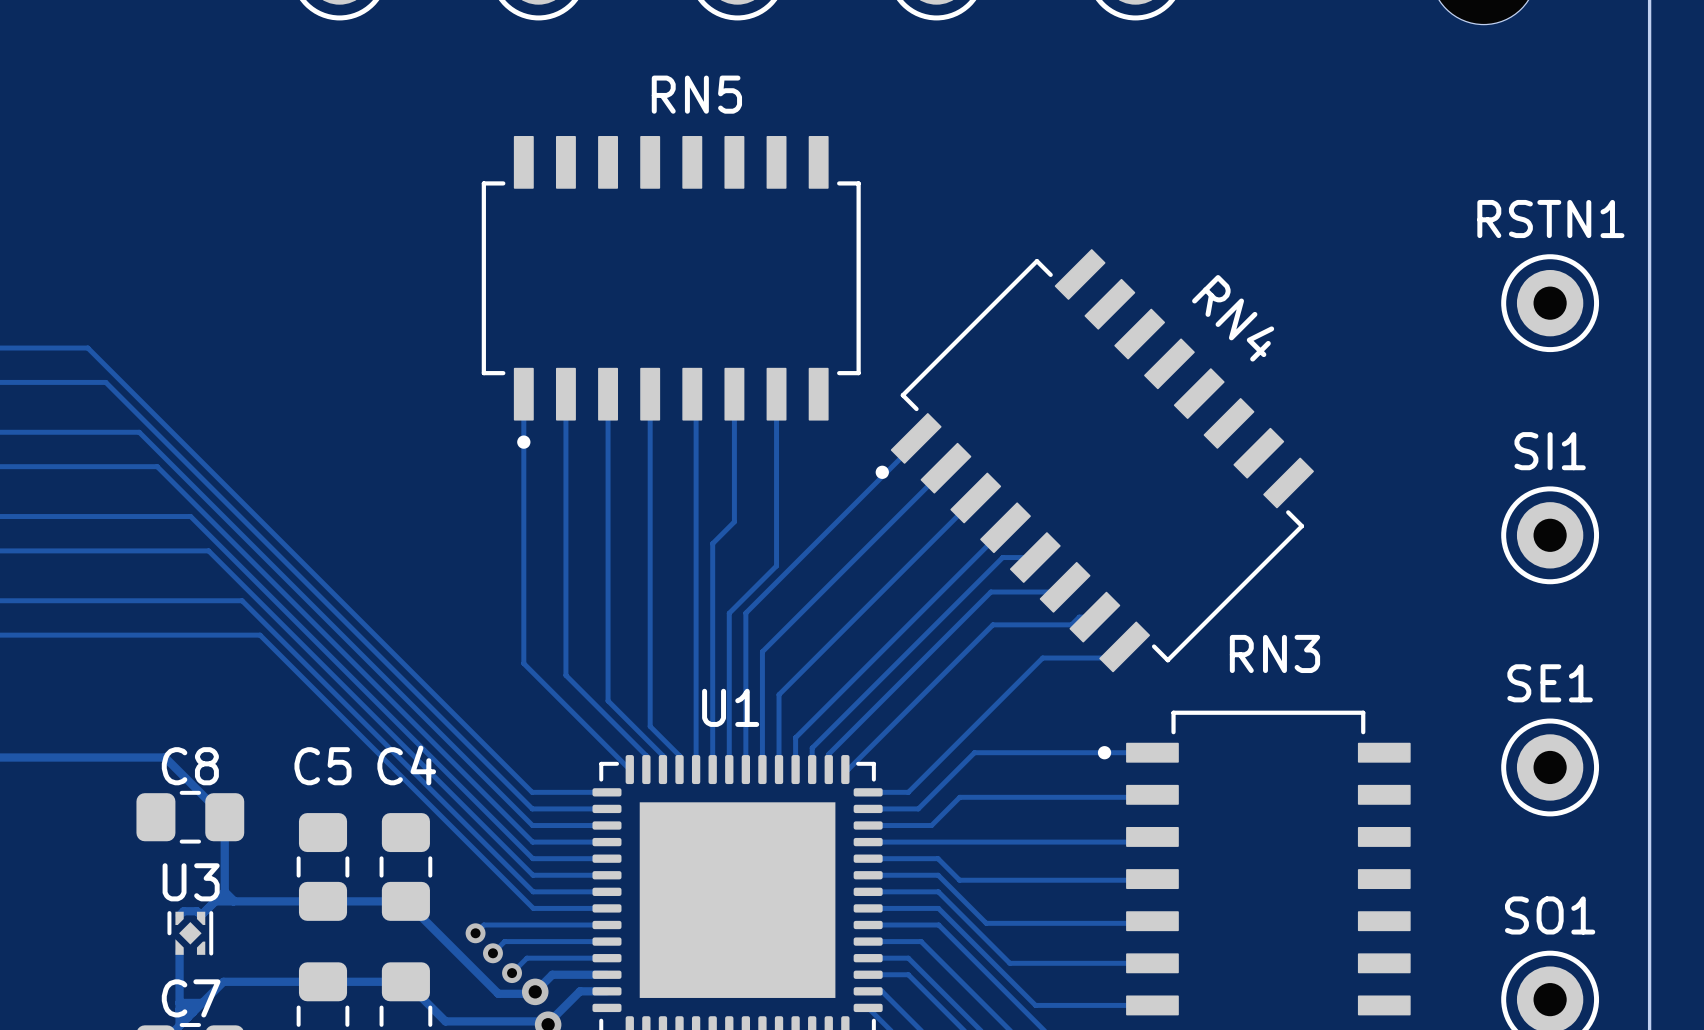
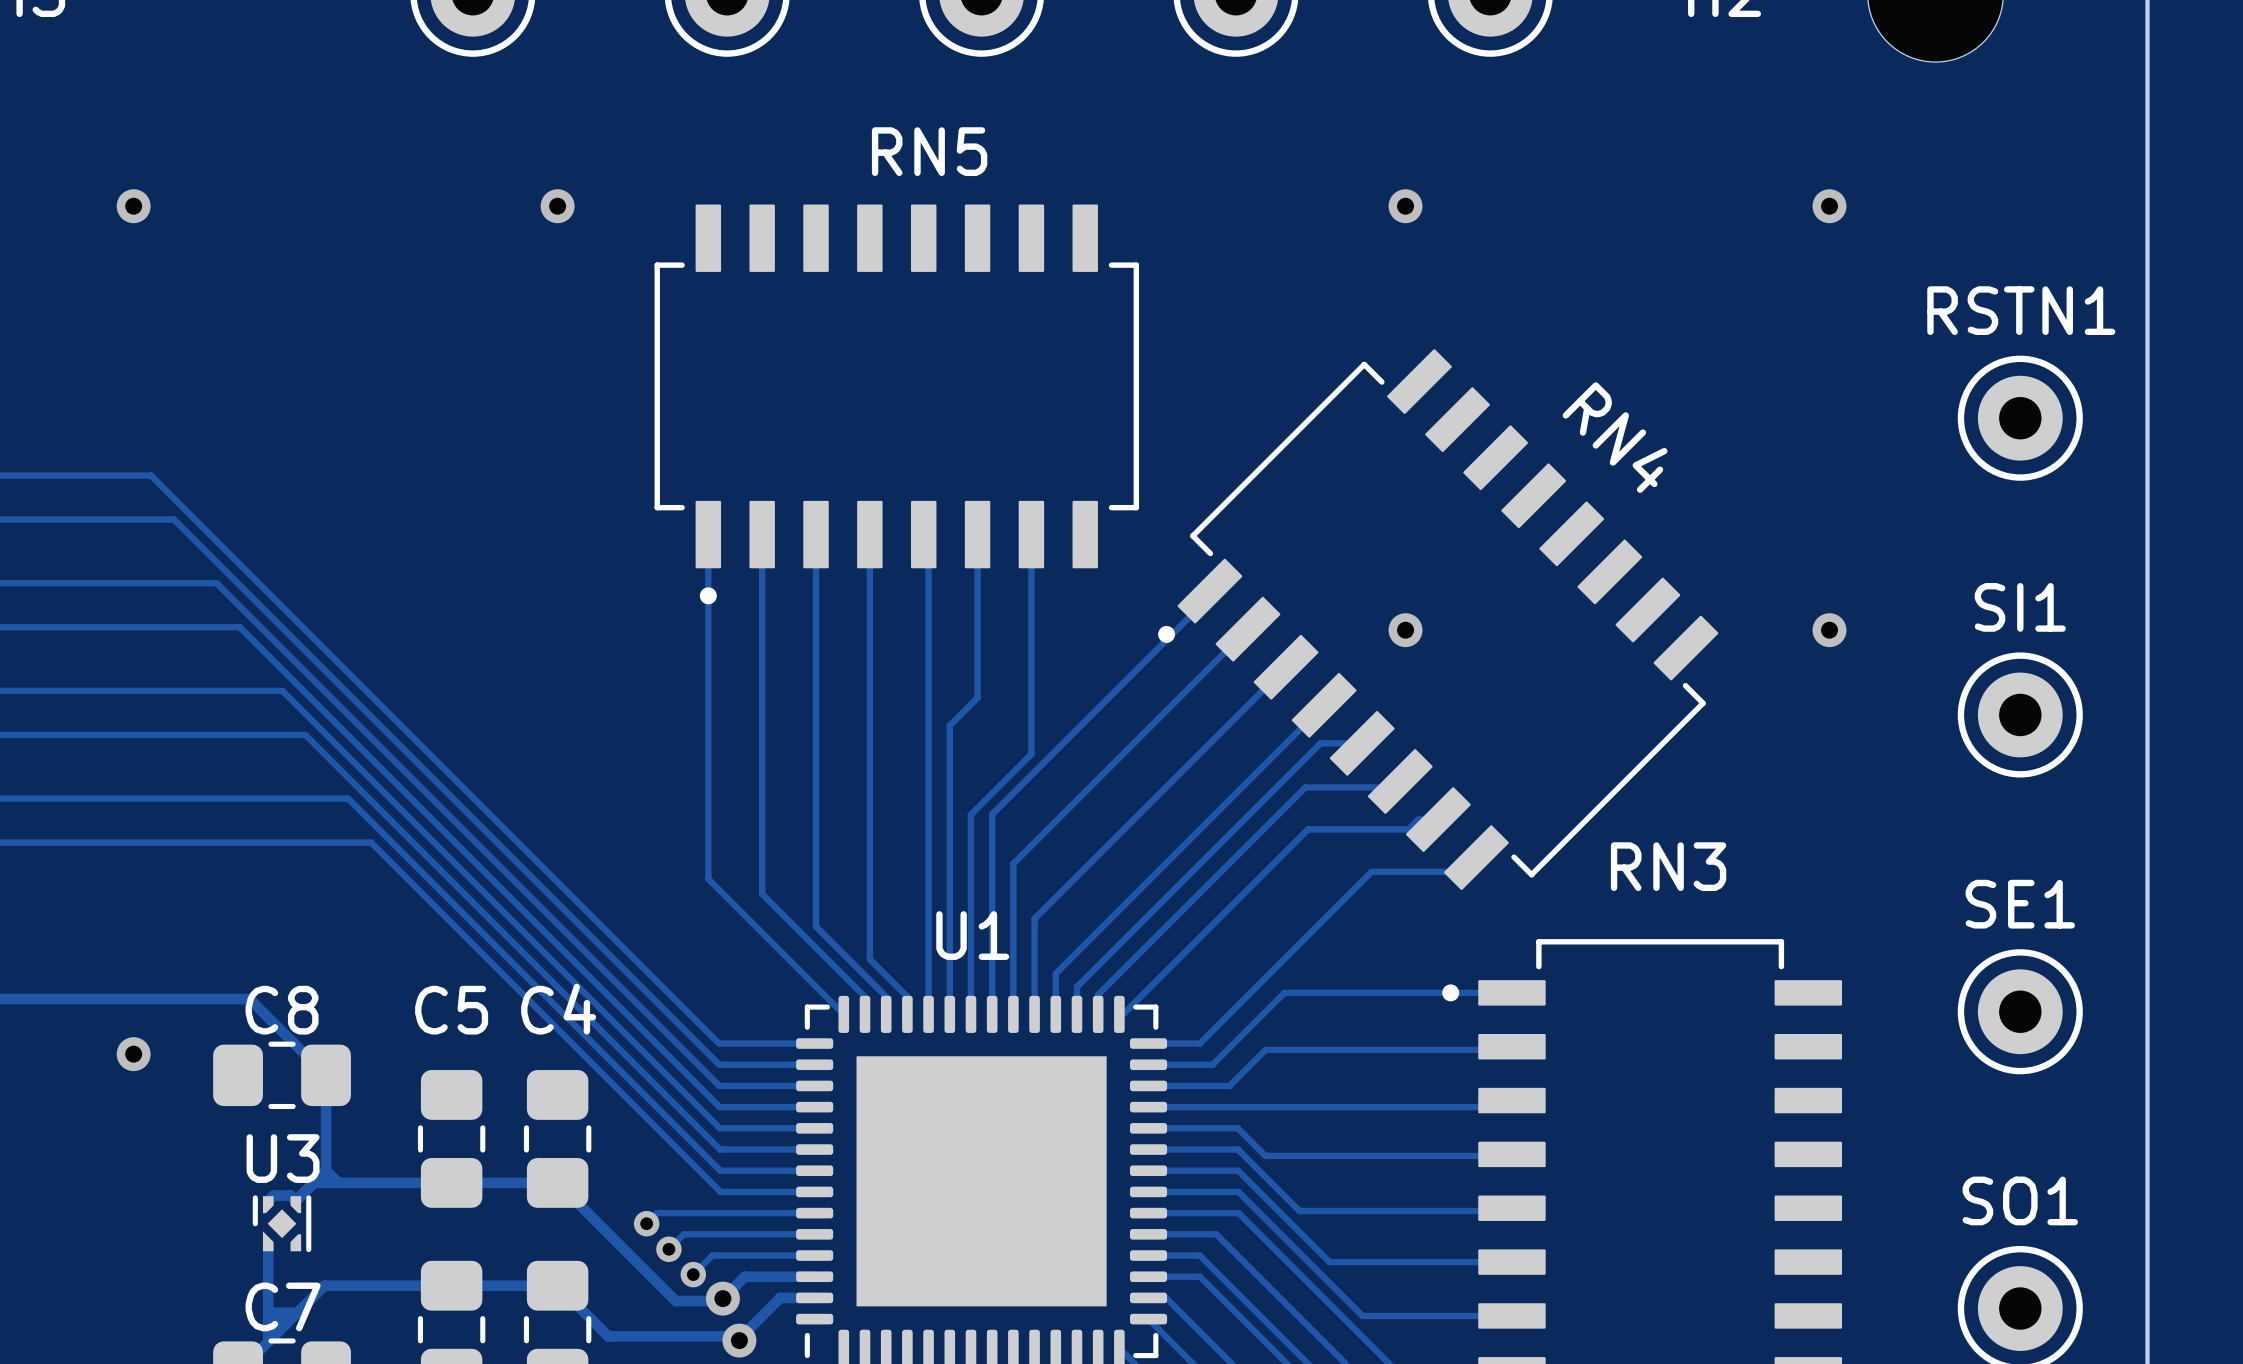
via: none -> (133, 206)
via: none -> (557, 206)
via: none -> (1405, 206)
via: none -> (1829, 206)
via: none -> (1405, 630)
via: none -> (1829, 630)
via: none -> (133, 1054)

